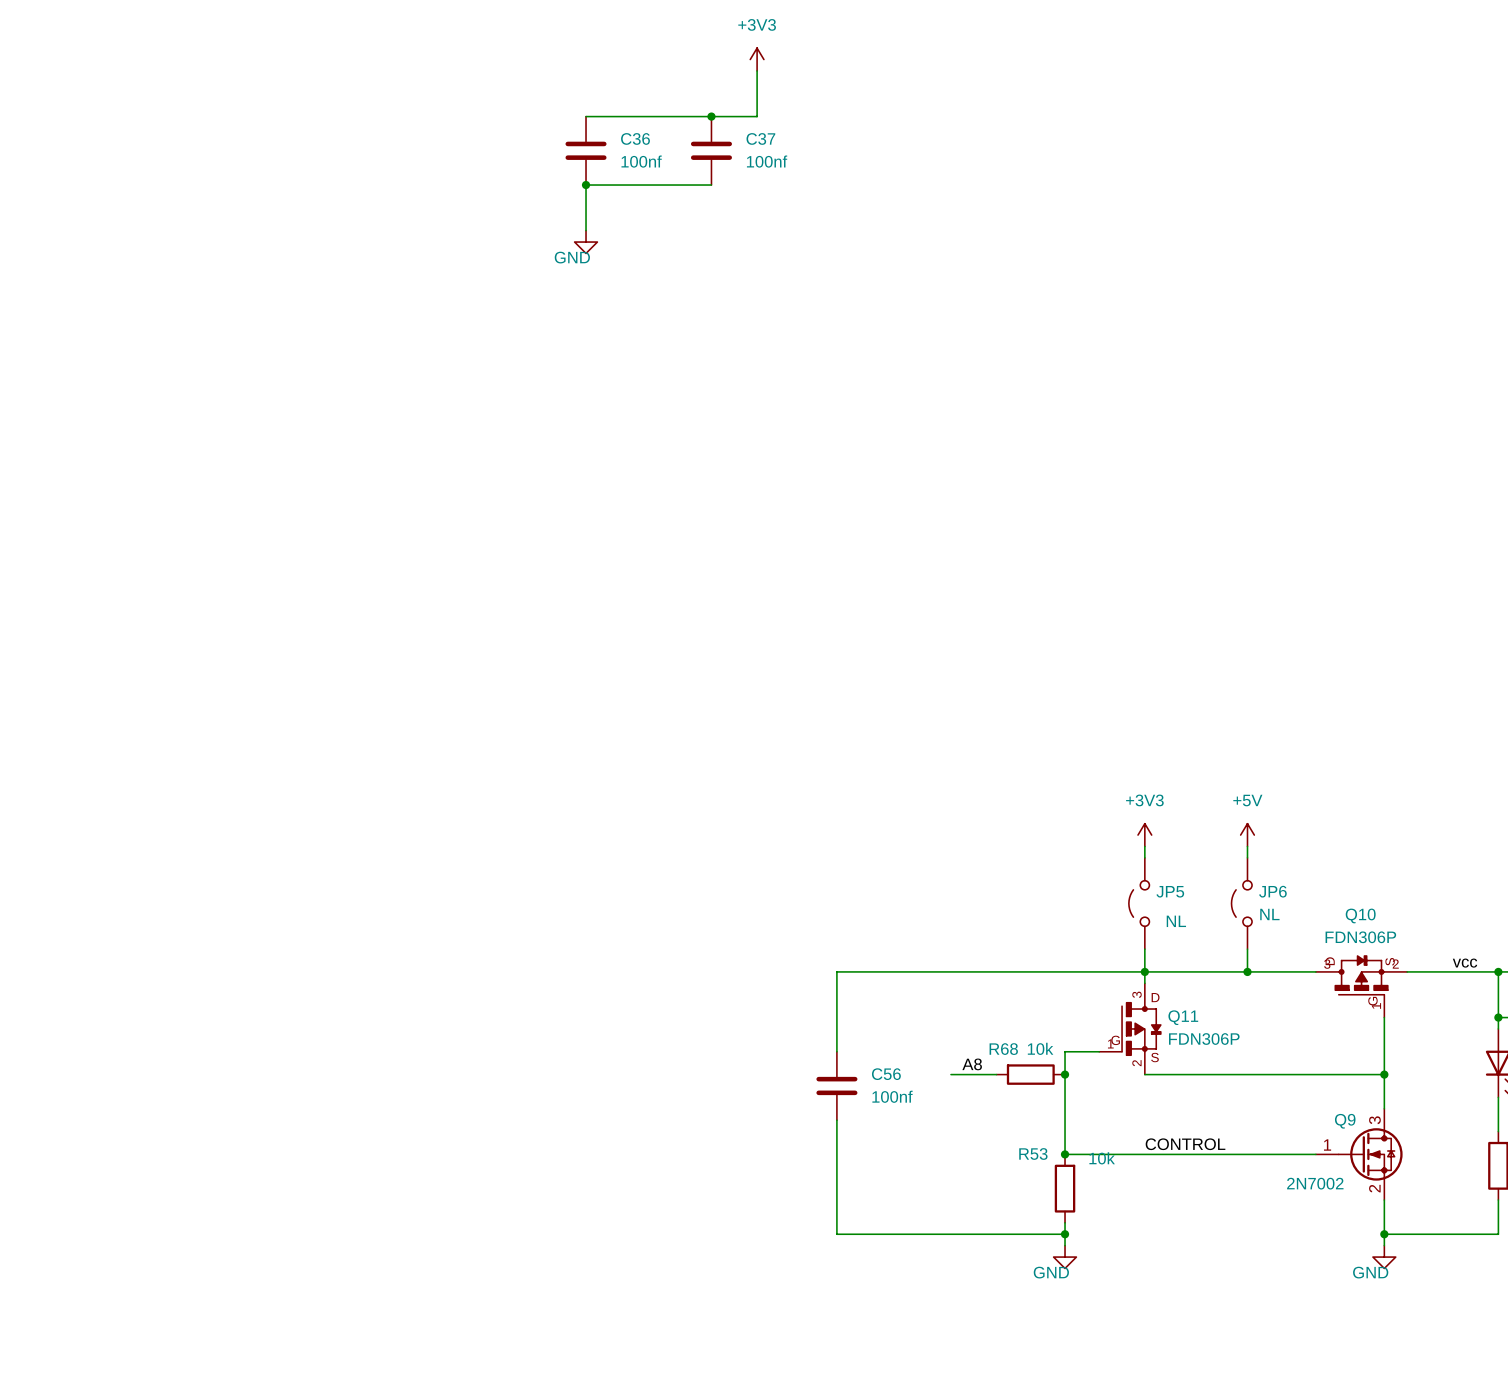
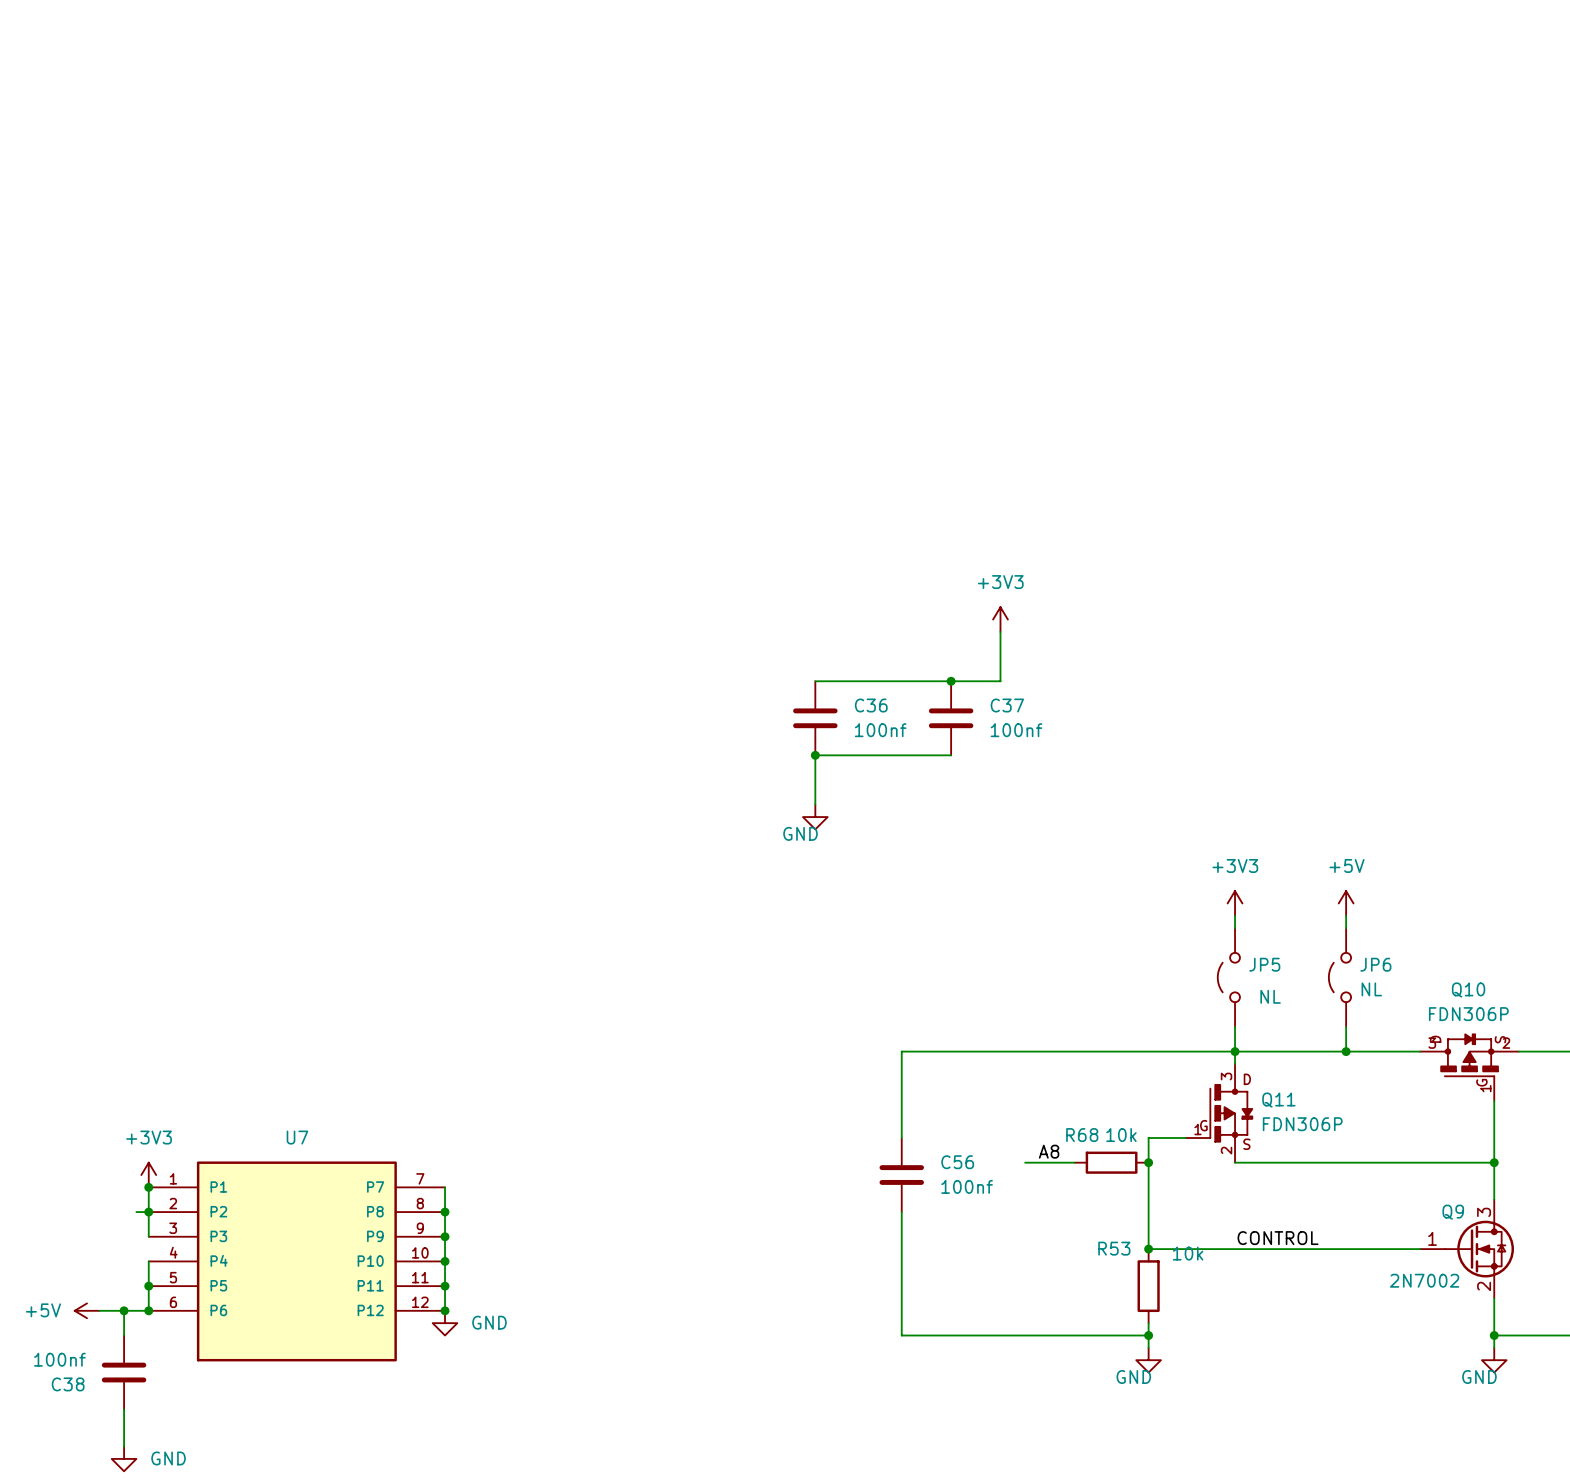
power symbol: +3V3 (757, 59) -> none
wire: (757, 70) (757, 116) (586, 116) -> none
junction: (711, 116) -> none
C36 position: (586, 150) -> (815, 718)
C37 position: (711, 150) -> (951, 718)
junction: (586, 185) -> none
wire: (711, 185) (586, 185) (586, 230) -> none
power symbol: GND (586, 242) -> none
power symbol: none -> +3V3 (1000, 619)
wire: none -> (1000, 631) (1000, 681) (815, 681)
junction: none -> (951, 681)
junction: none -> (815, 755)
wire: none -> (951, 755) (815, 755) (815, 804)
power symbol: none -> GND (815, 817)
power symbol: none -> +3V3 (148, 1175)
wire: none -> (148, 1187) (148, 1236)
junction: none -> (148, 1187)
wire: none -> (445, 1187) (445, 1310)
wire: none -> (136, 1212) (148, 1212)
junction: none -> (148, 1212)
junction: none -> (445, 1212)
junction: none -> (445, 1236)
wire: none -> (148, 1261) (148, 1310) (99, 1310)
U7: none -> (296, 1261)
junction: none -> (445, 1261)
junction: none -> (148, 1286)
junction: none -> (445, 1286)
power symbol: none -> +5V (87, 1310)
wire: none -> (124, 1310) (124, 1335)
junction: none -> (124, 1310)
junction: none -> (148, 1310)
junction: none -> (445, 1310)
power symbol: none -> GND (445, 1323)
C38: none -> 100nf (124, 1372)
wire: none -> (124, 1409) (124, 1446)
power symbol: none -> GND (124, 1458)

